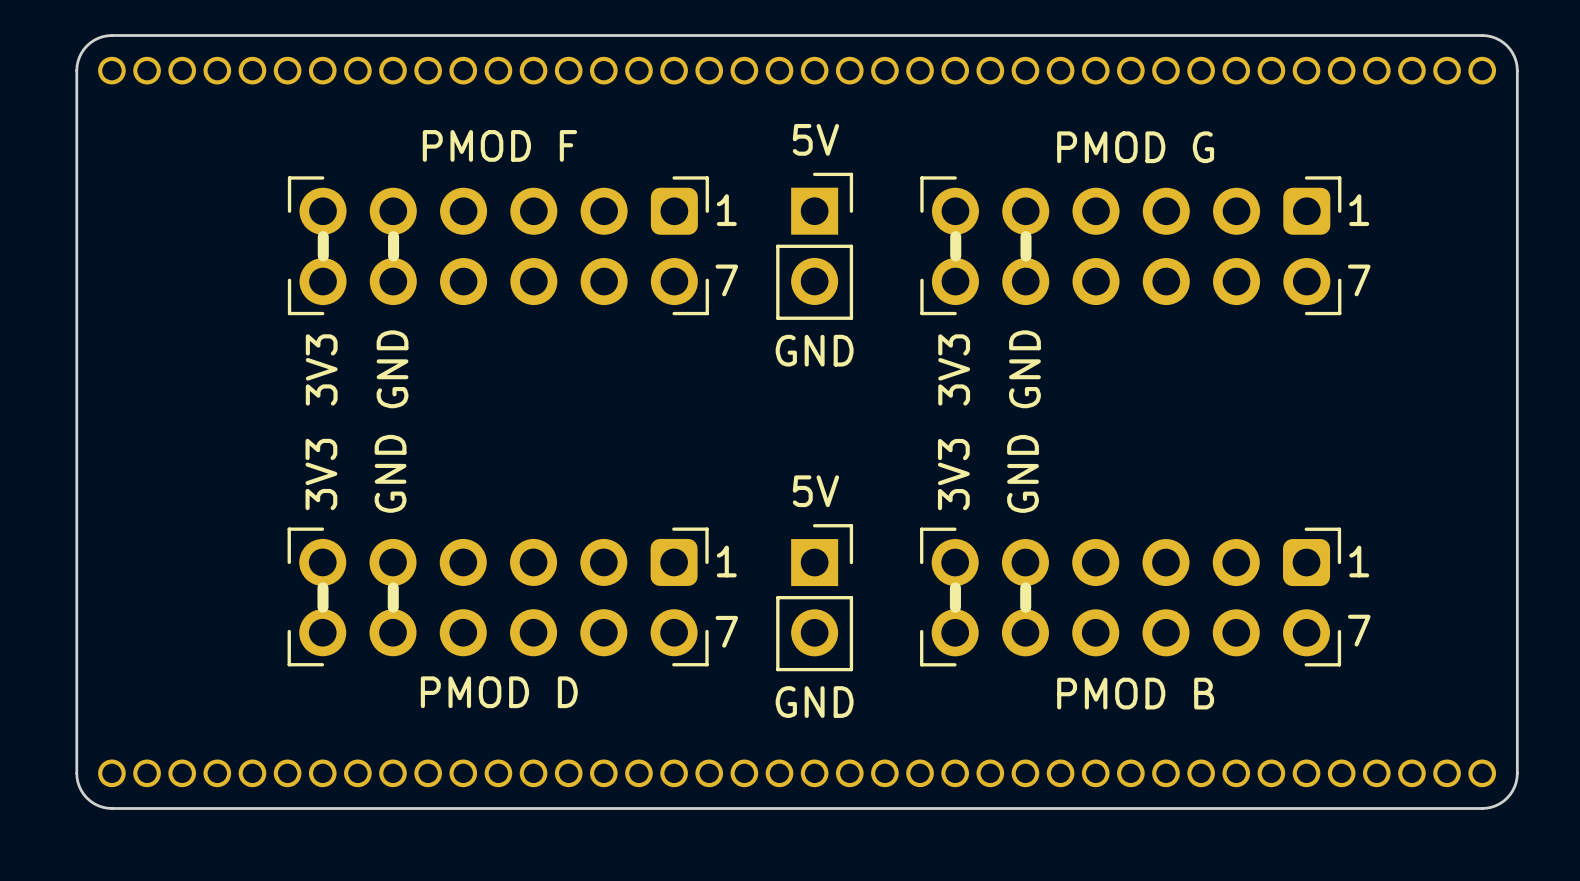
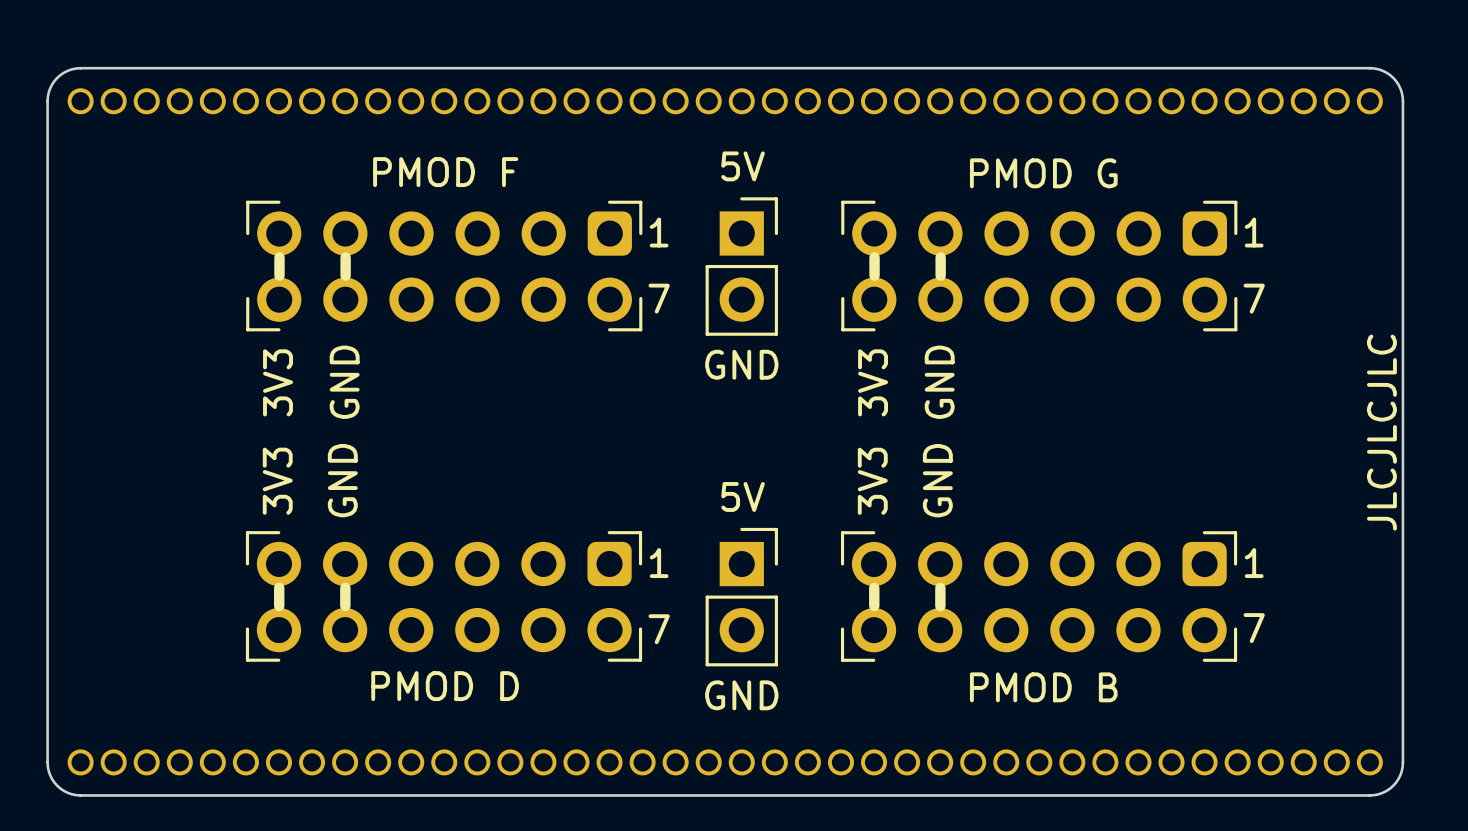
text: none -> JLCJLCJLC (1381, 432)

